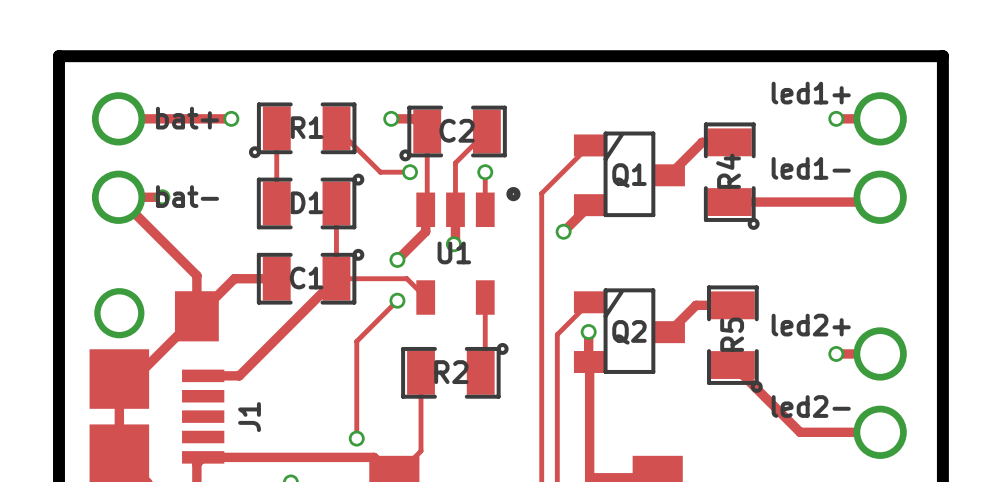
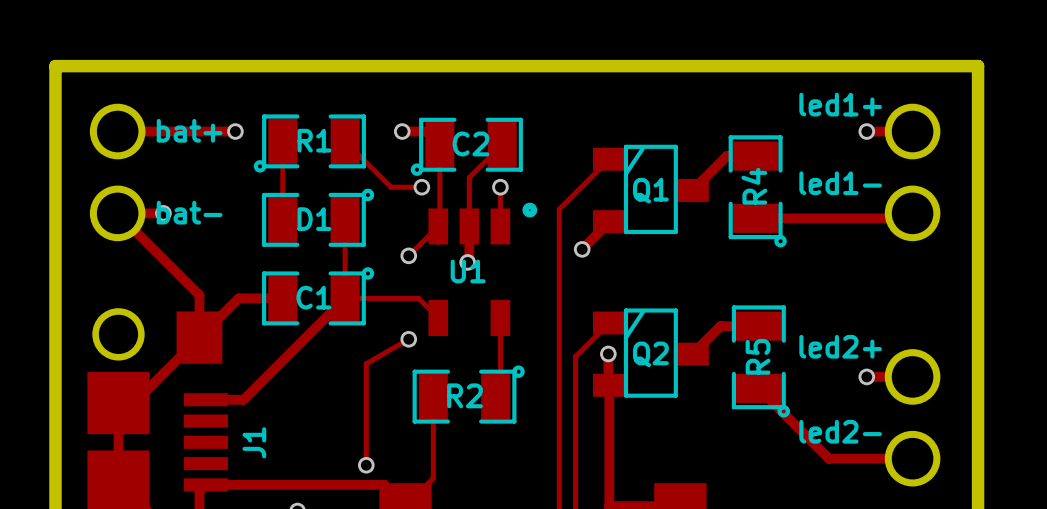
track: (425, 209) (425, 231) (397, 259) -> (438, 226) (408, 255)
via position: (397, 259) -> (408, 255)
track: (397, 300) (356, 341) -> (408, 339) (366, 363)
via position: (397, 300) -> (408, 339)

